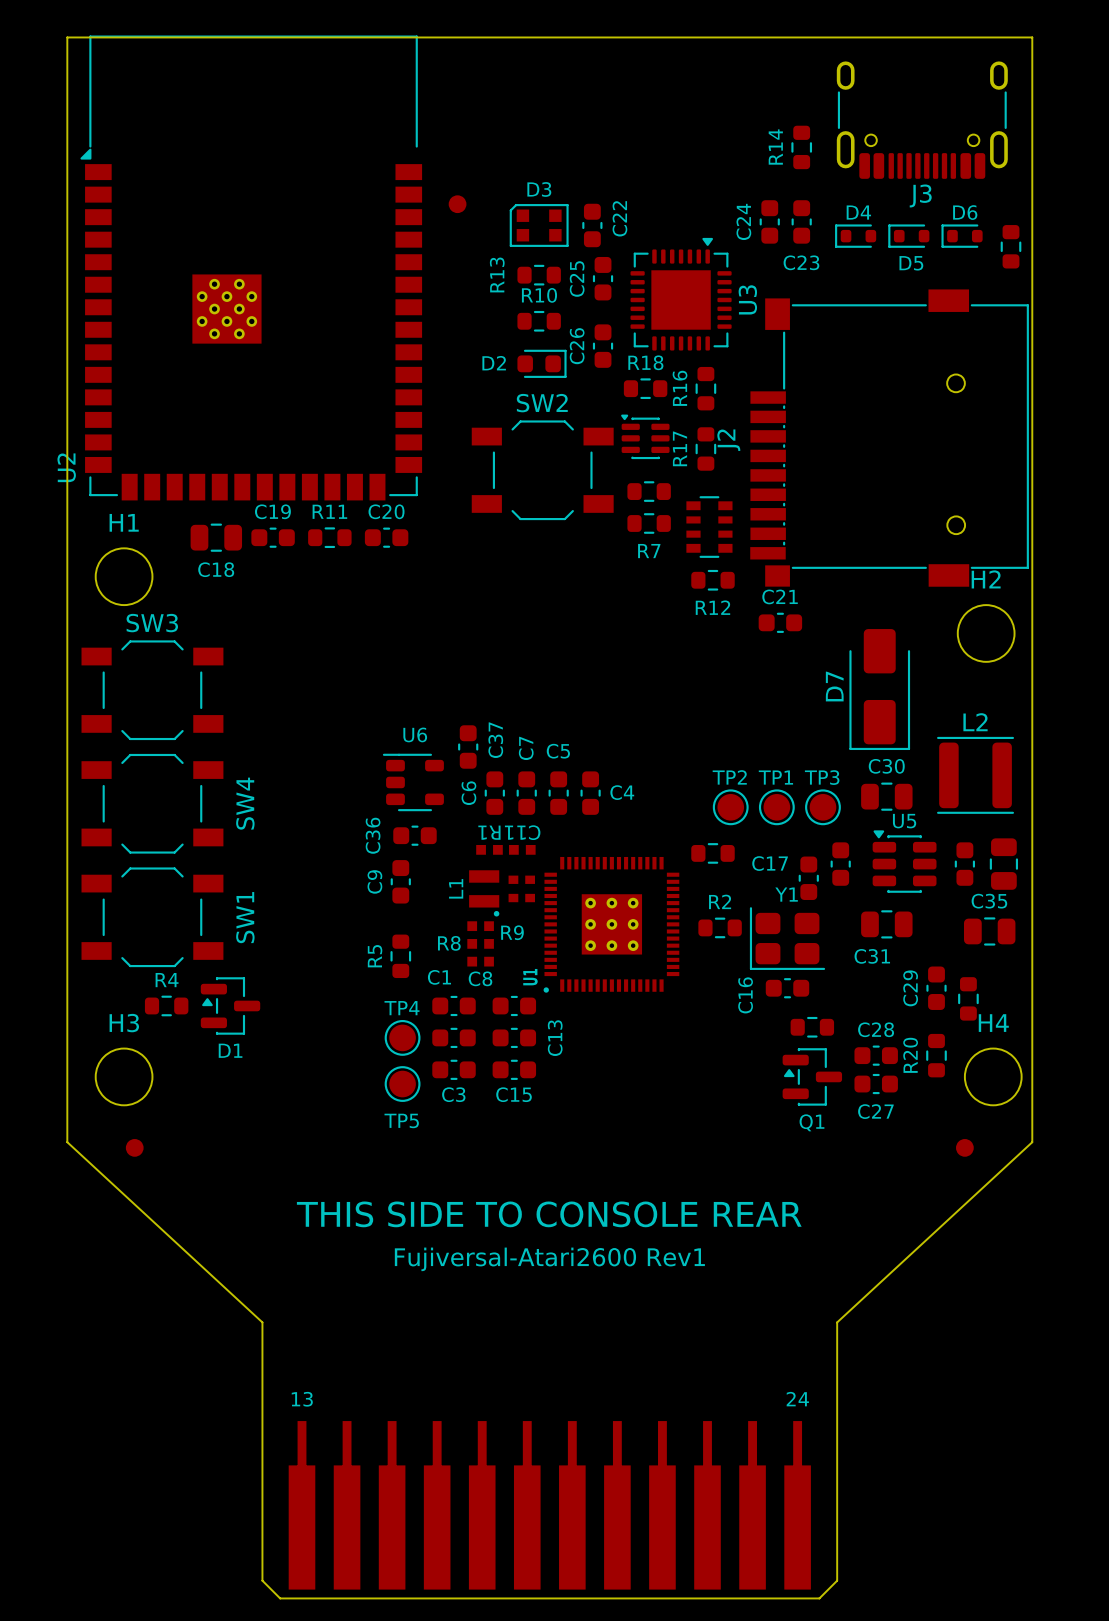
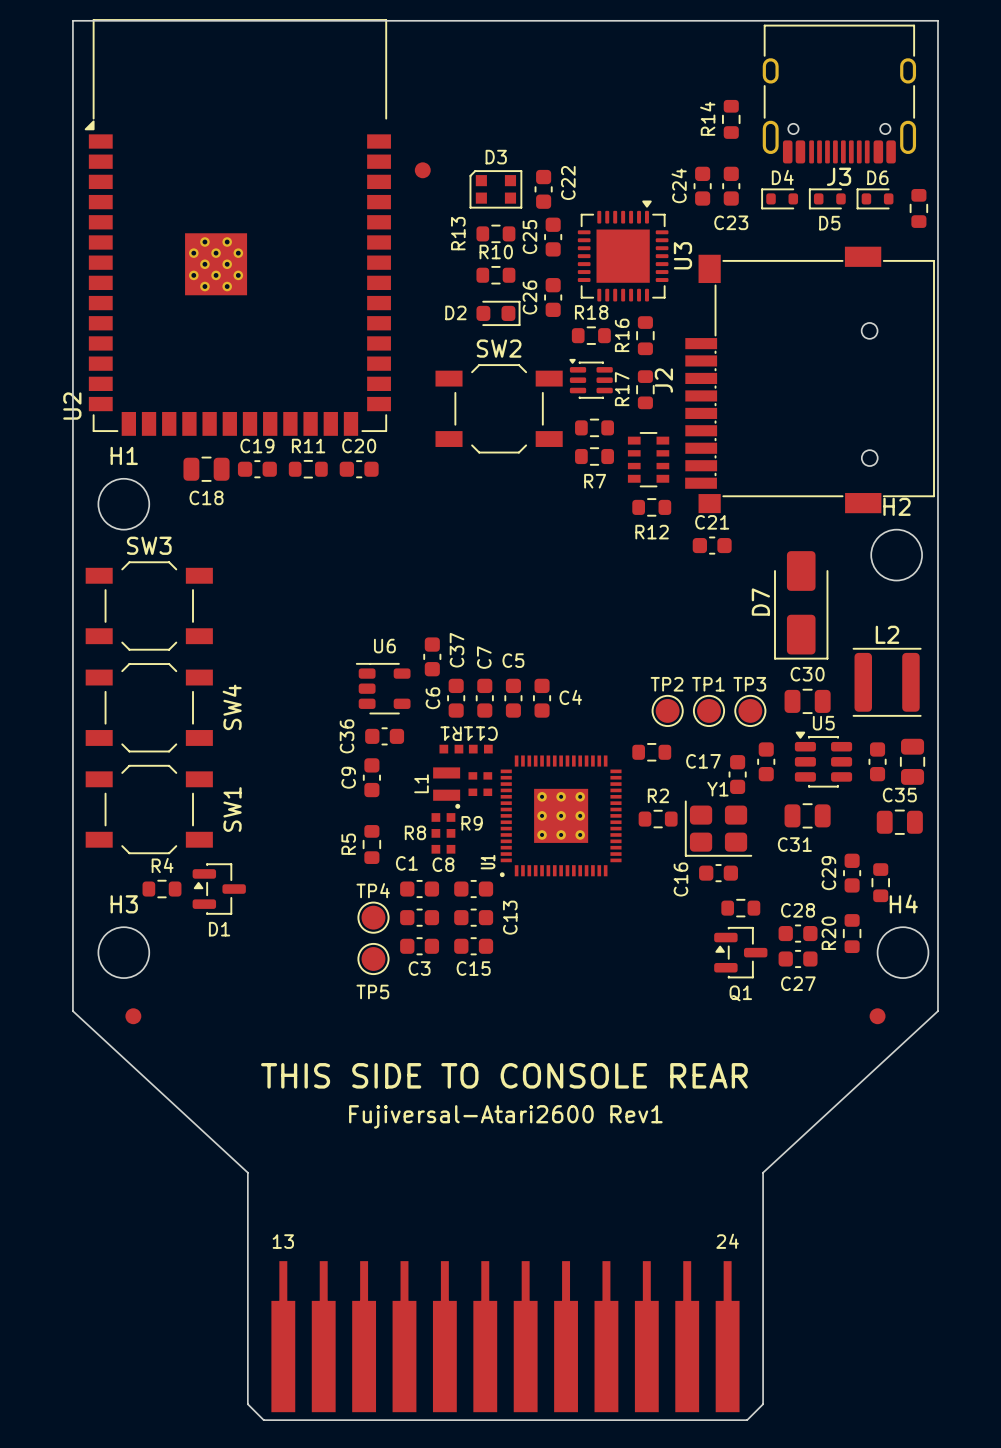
J3 footprint: [836, 61, 1008, 179] -> [762, 24, 917, 164]

